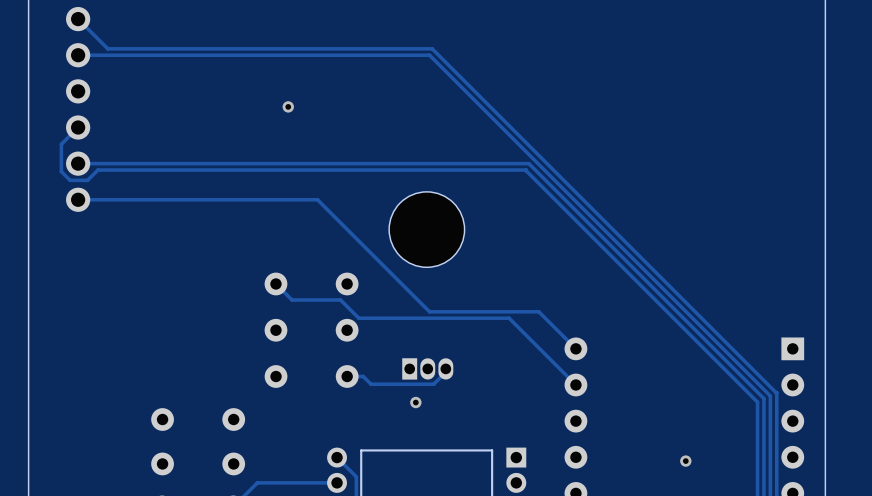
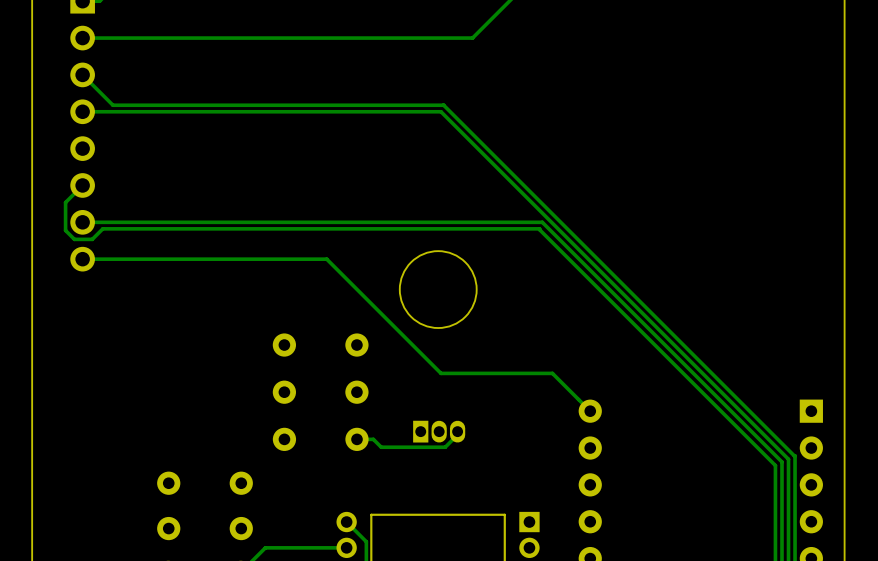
via: (288, 106) -> none
track: (275, 283) (291, 299) (340, 299) (358, 318) (509, 318) (575, 384) -> none
via: (415, 402) -> none
via: (685, 461) -> none

